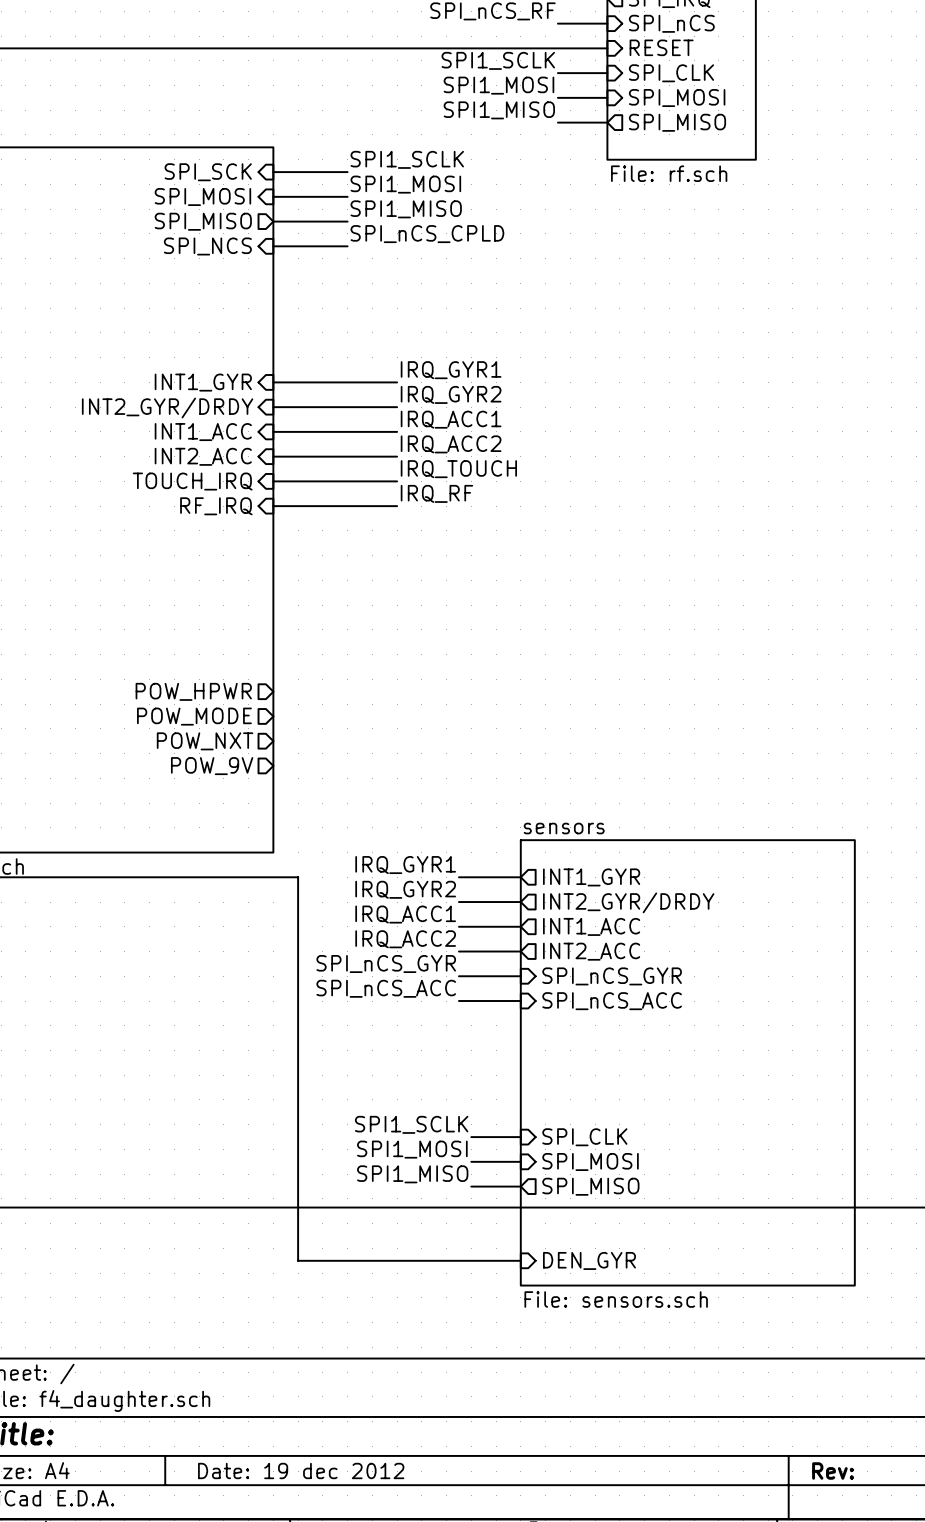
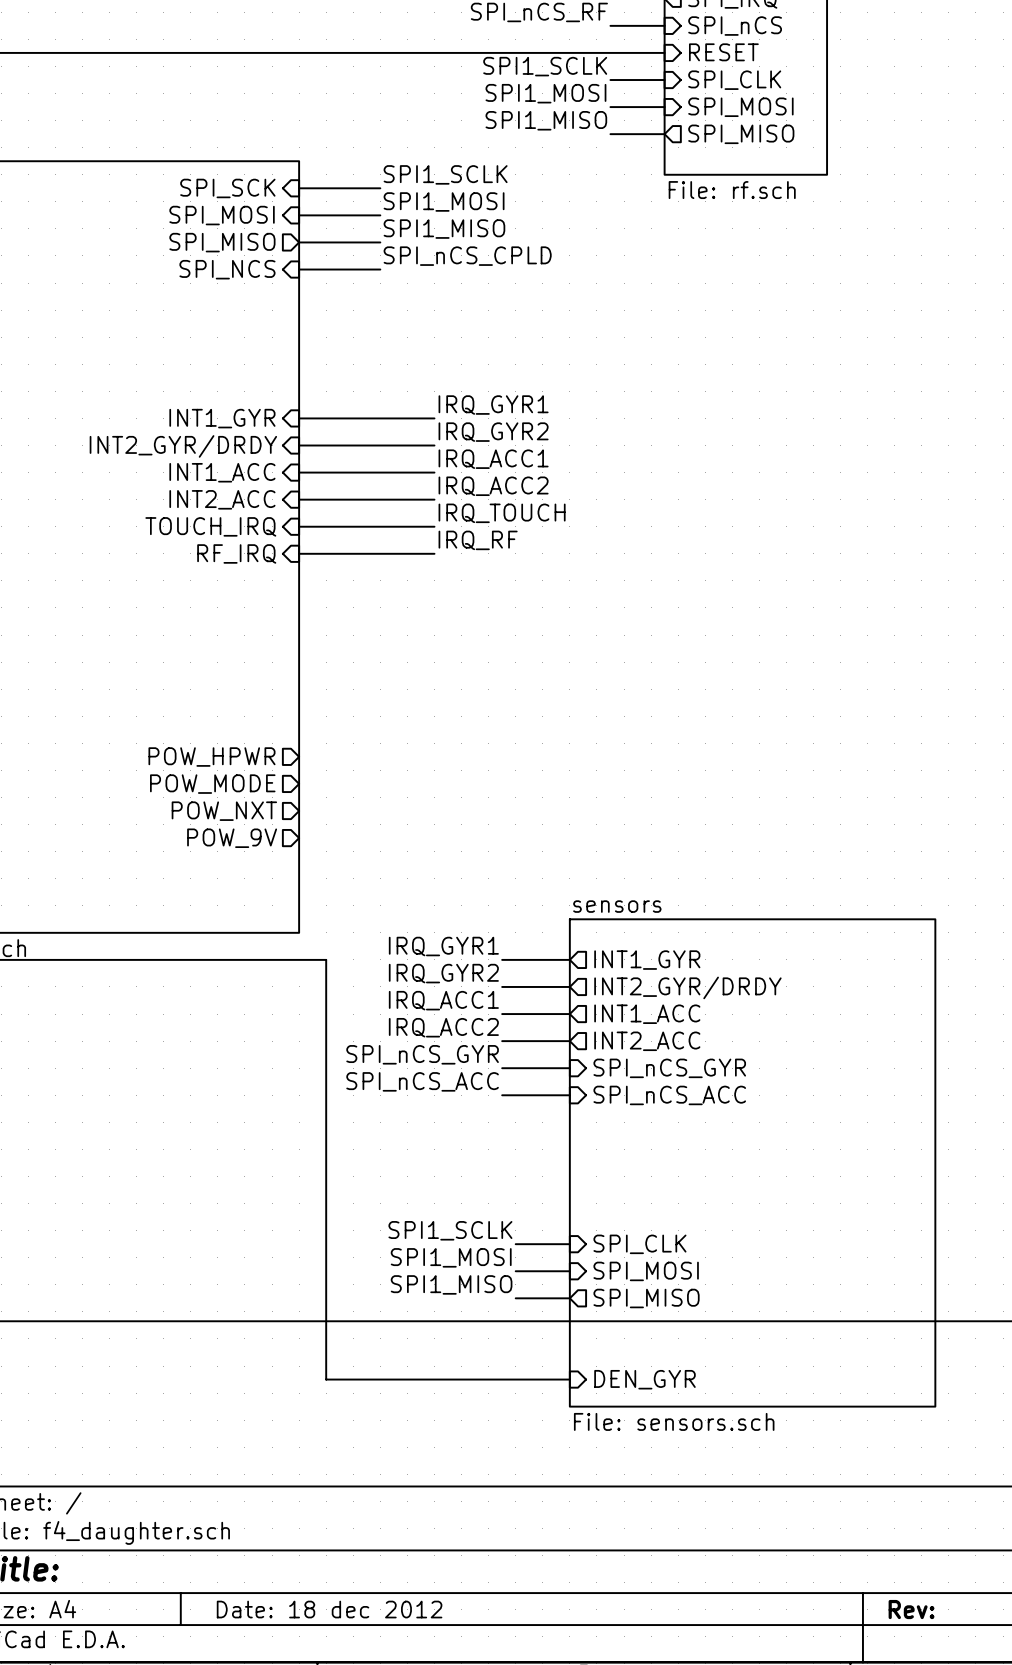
title block: Date: 19 dec 2012 (301, 1470) -> Date: 18 dec 2012 (329, 1609)

